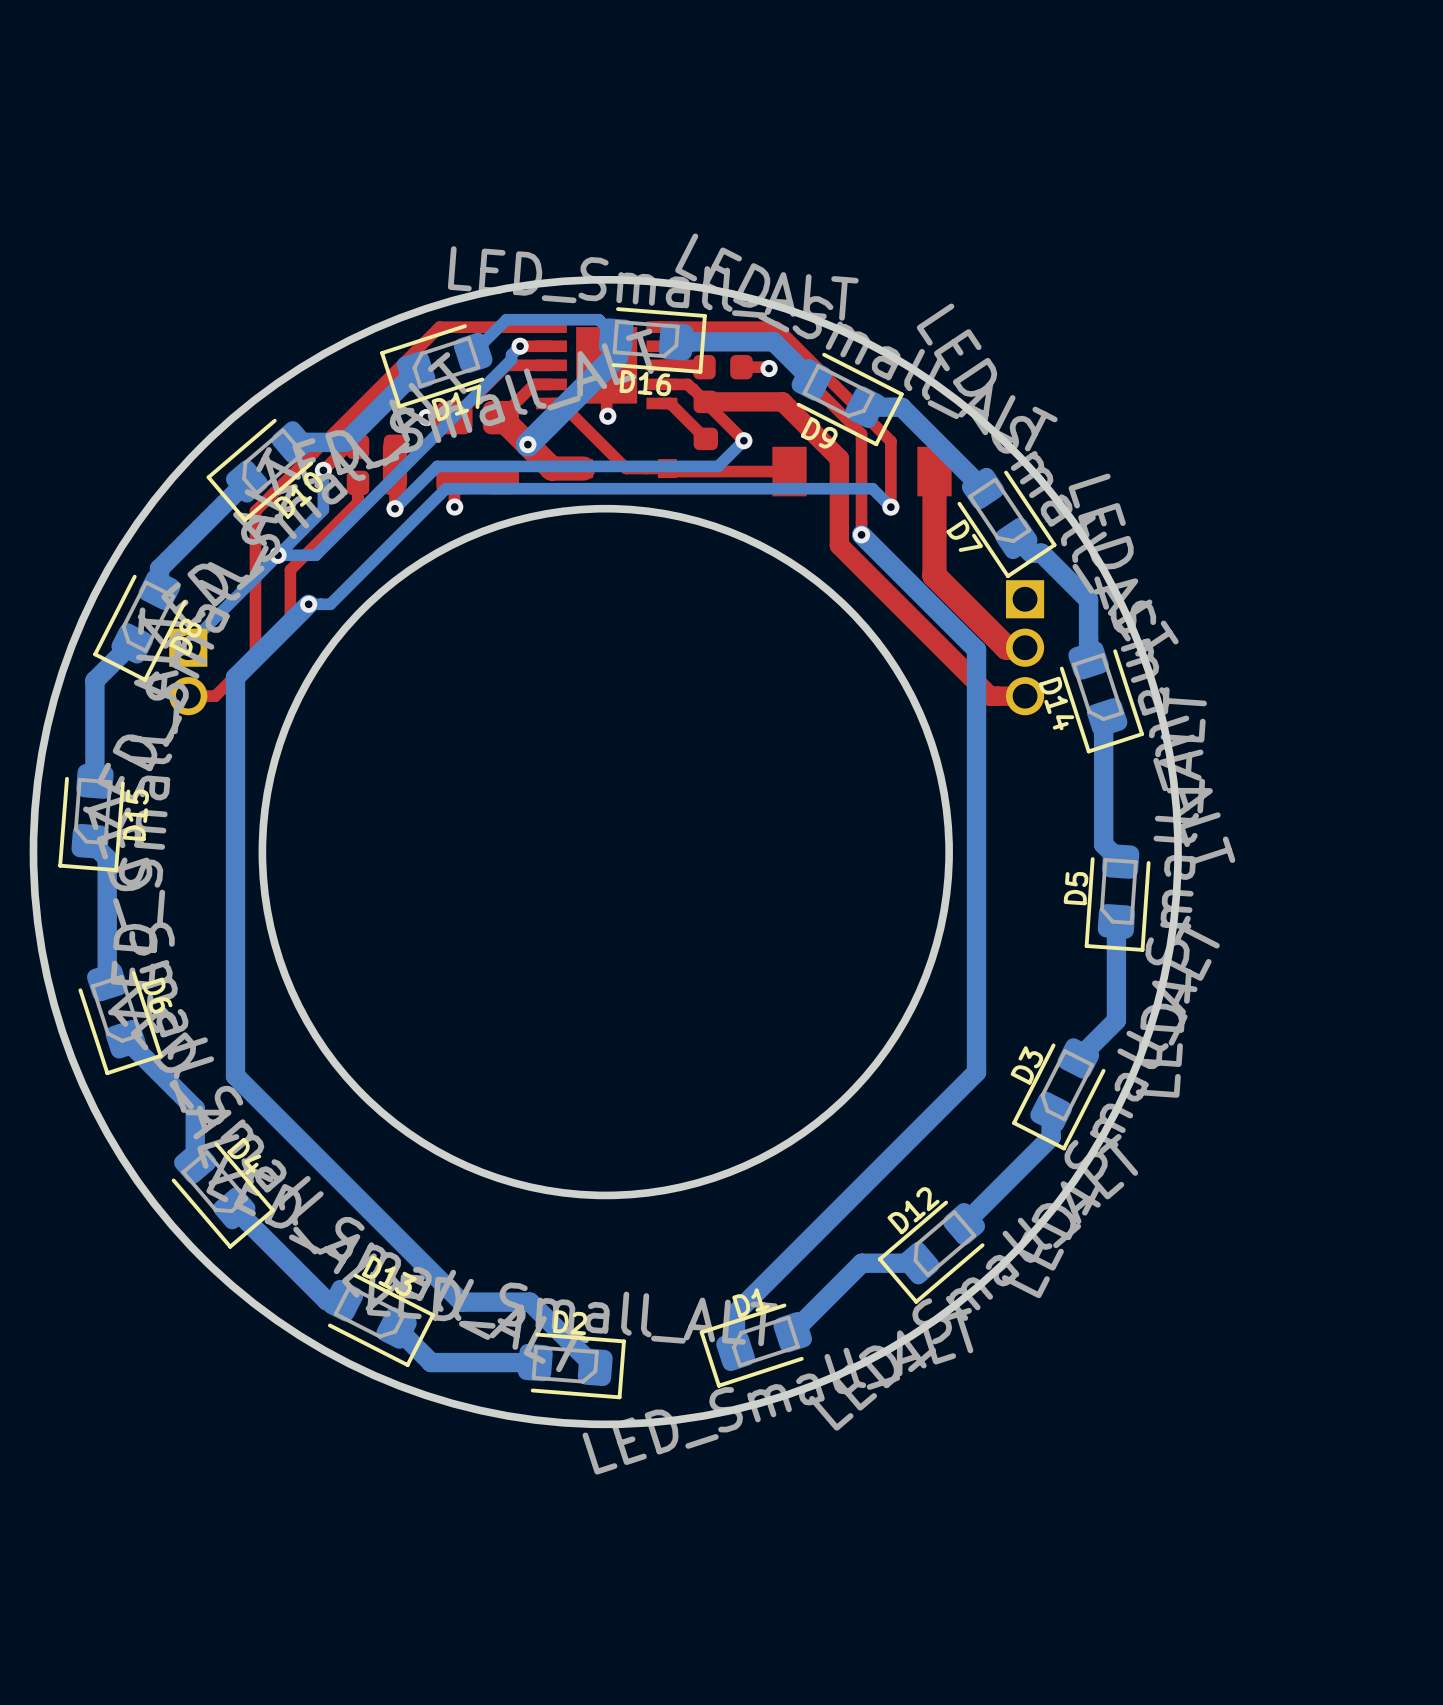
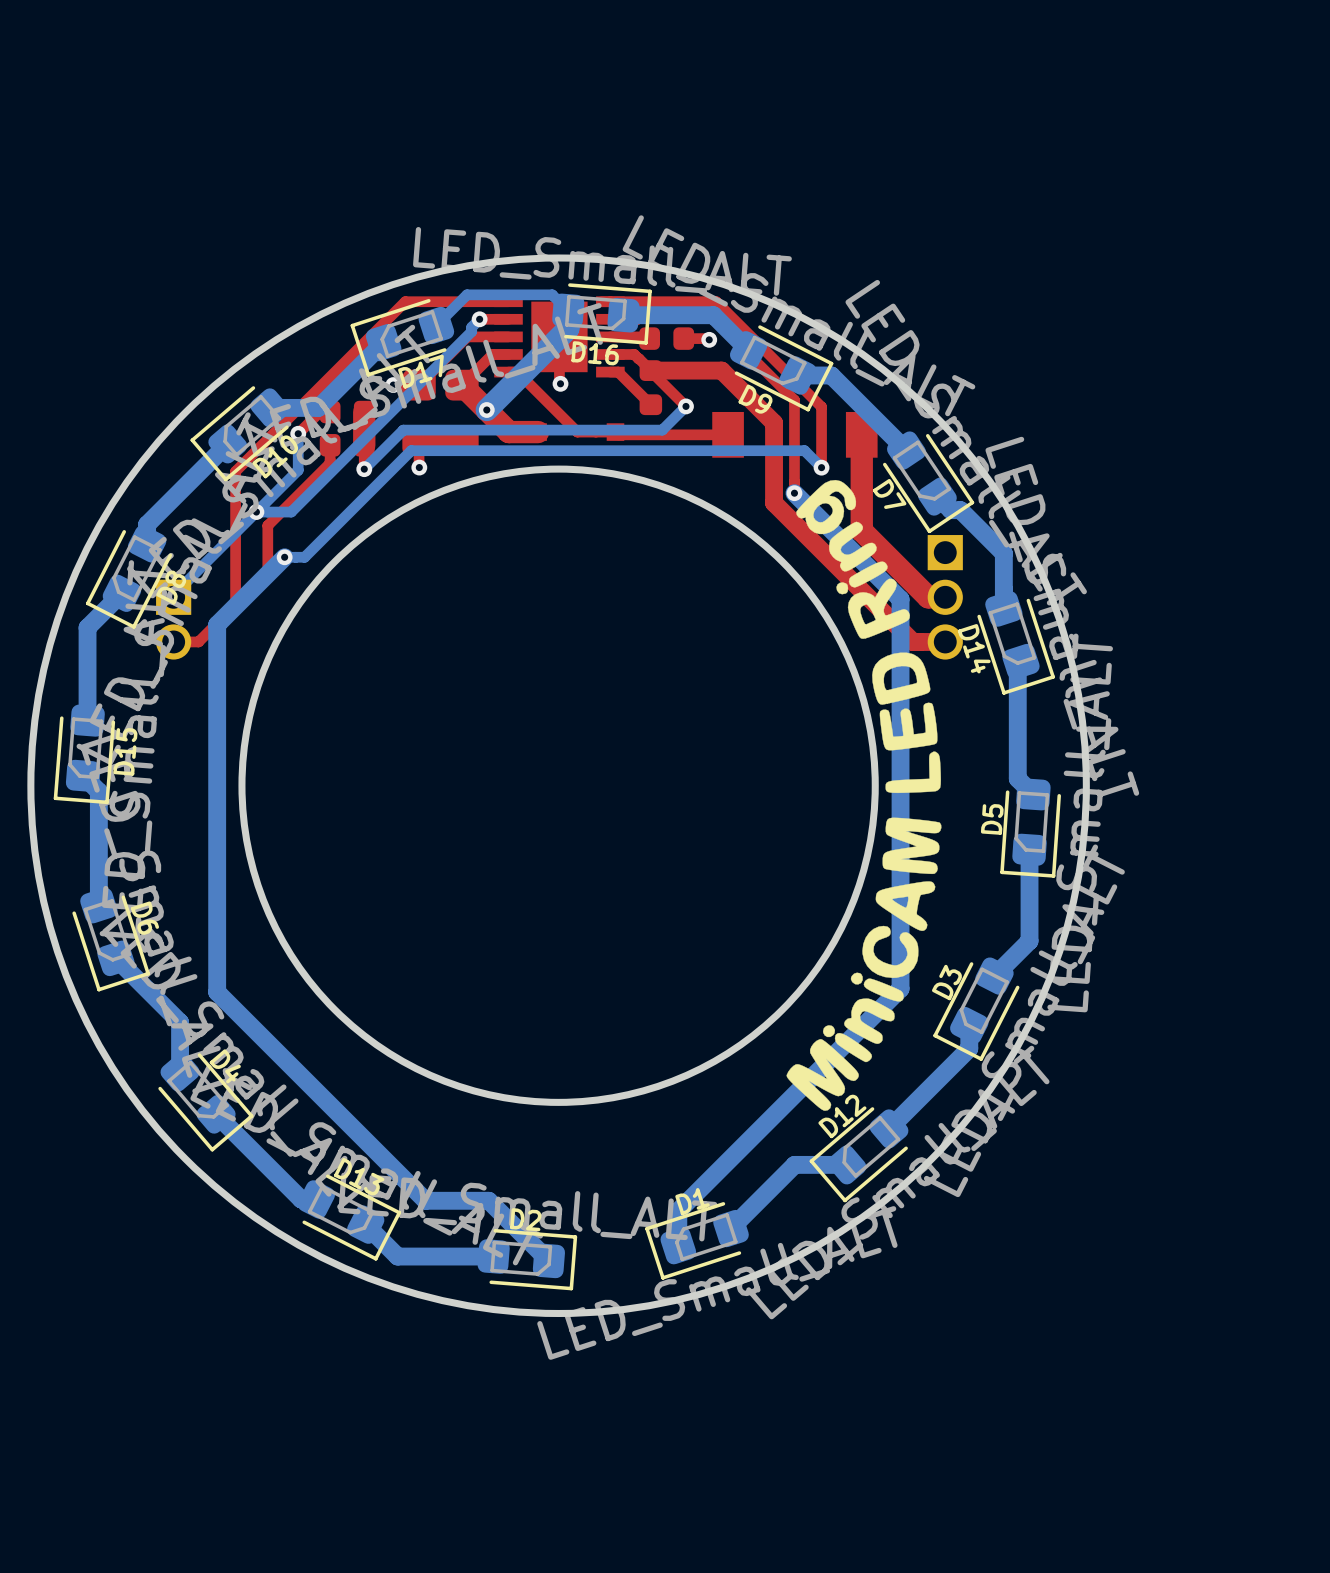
drawing: none -> [786, 479, 942, 1111]

